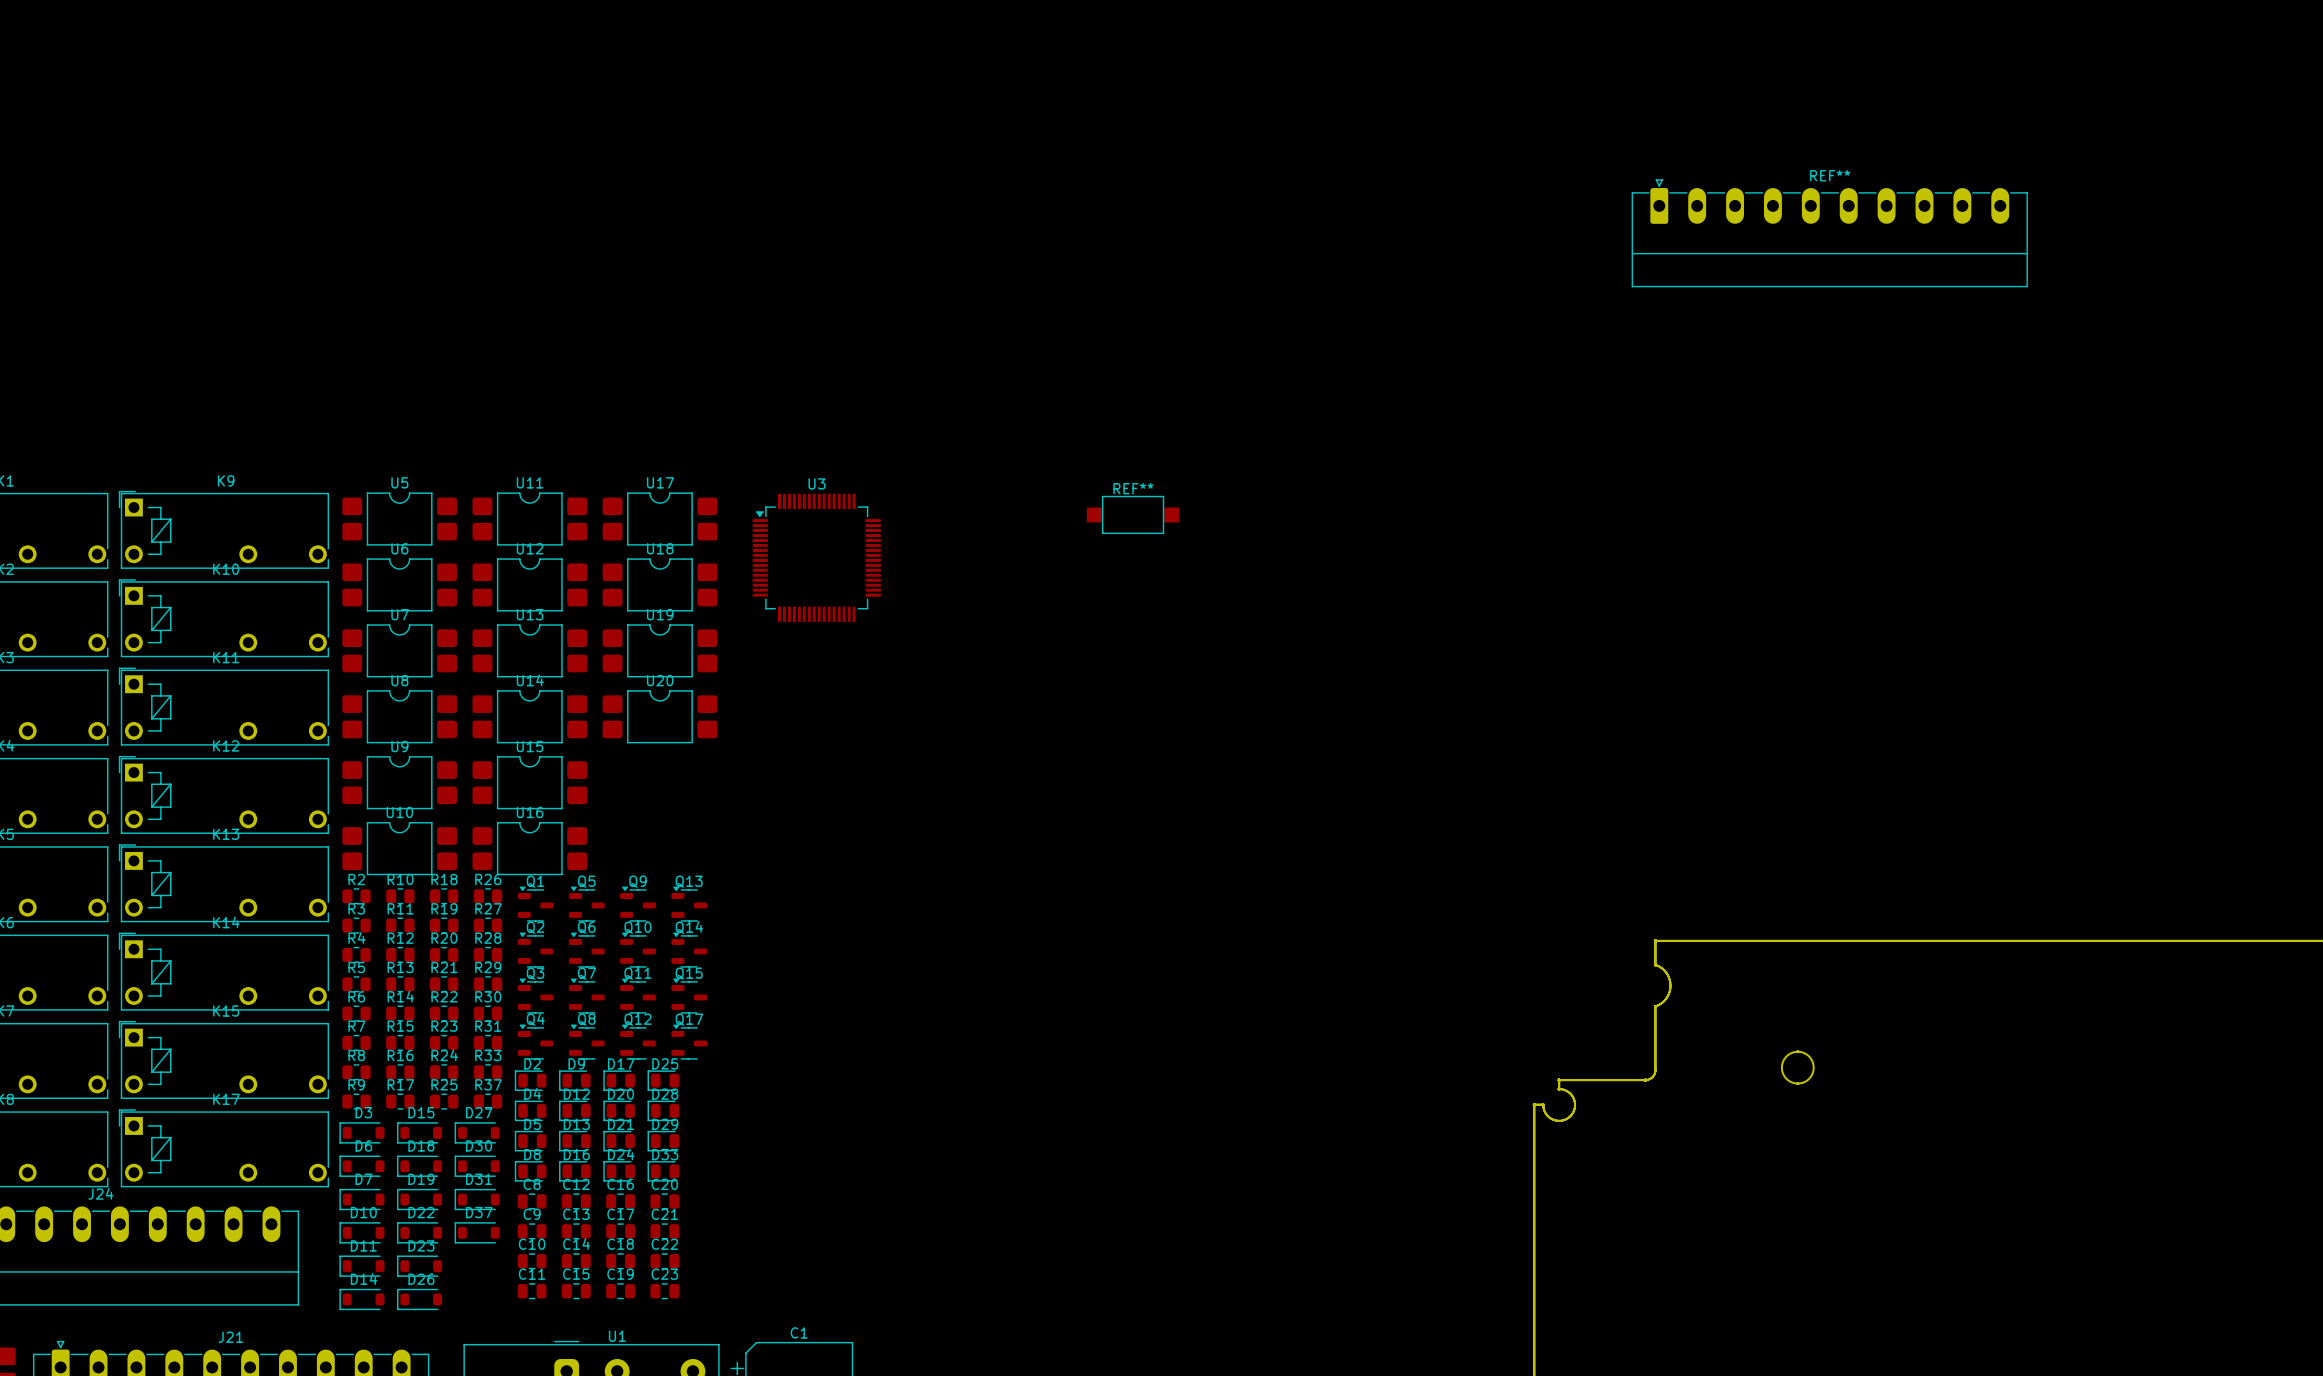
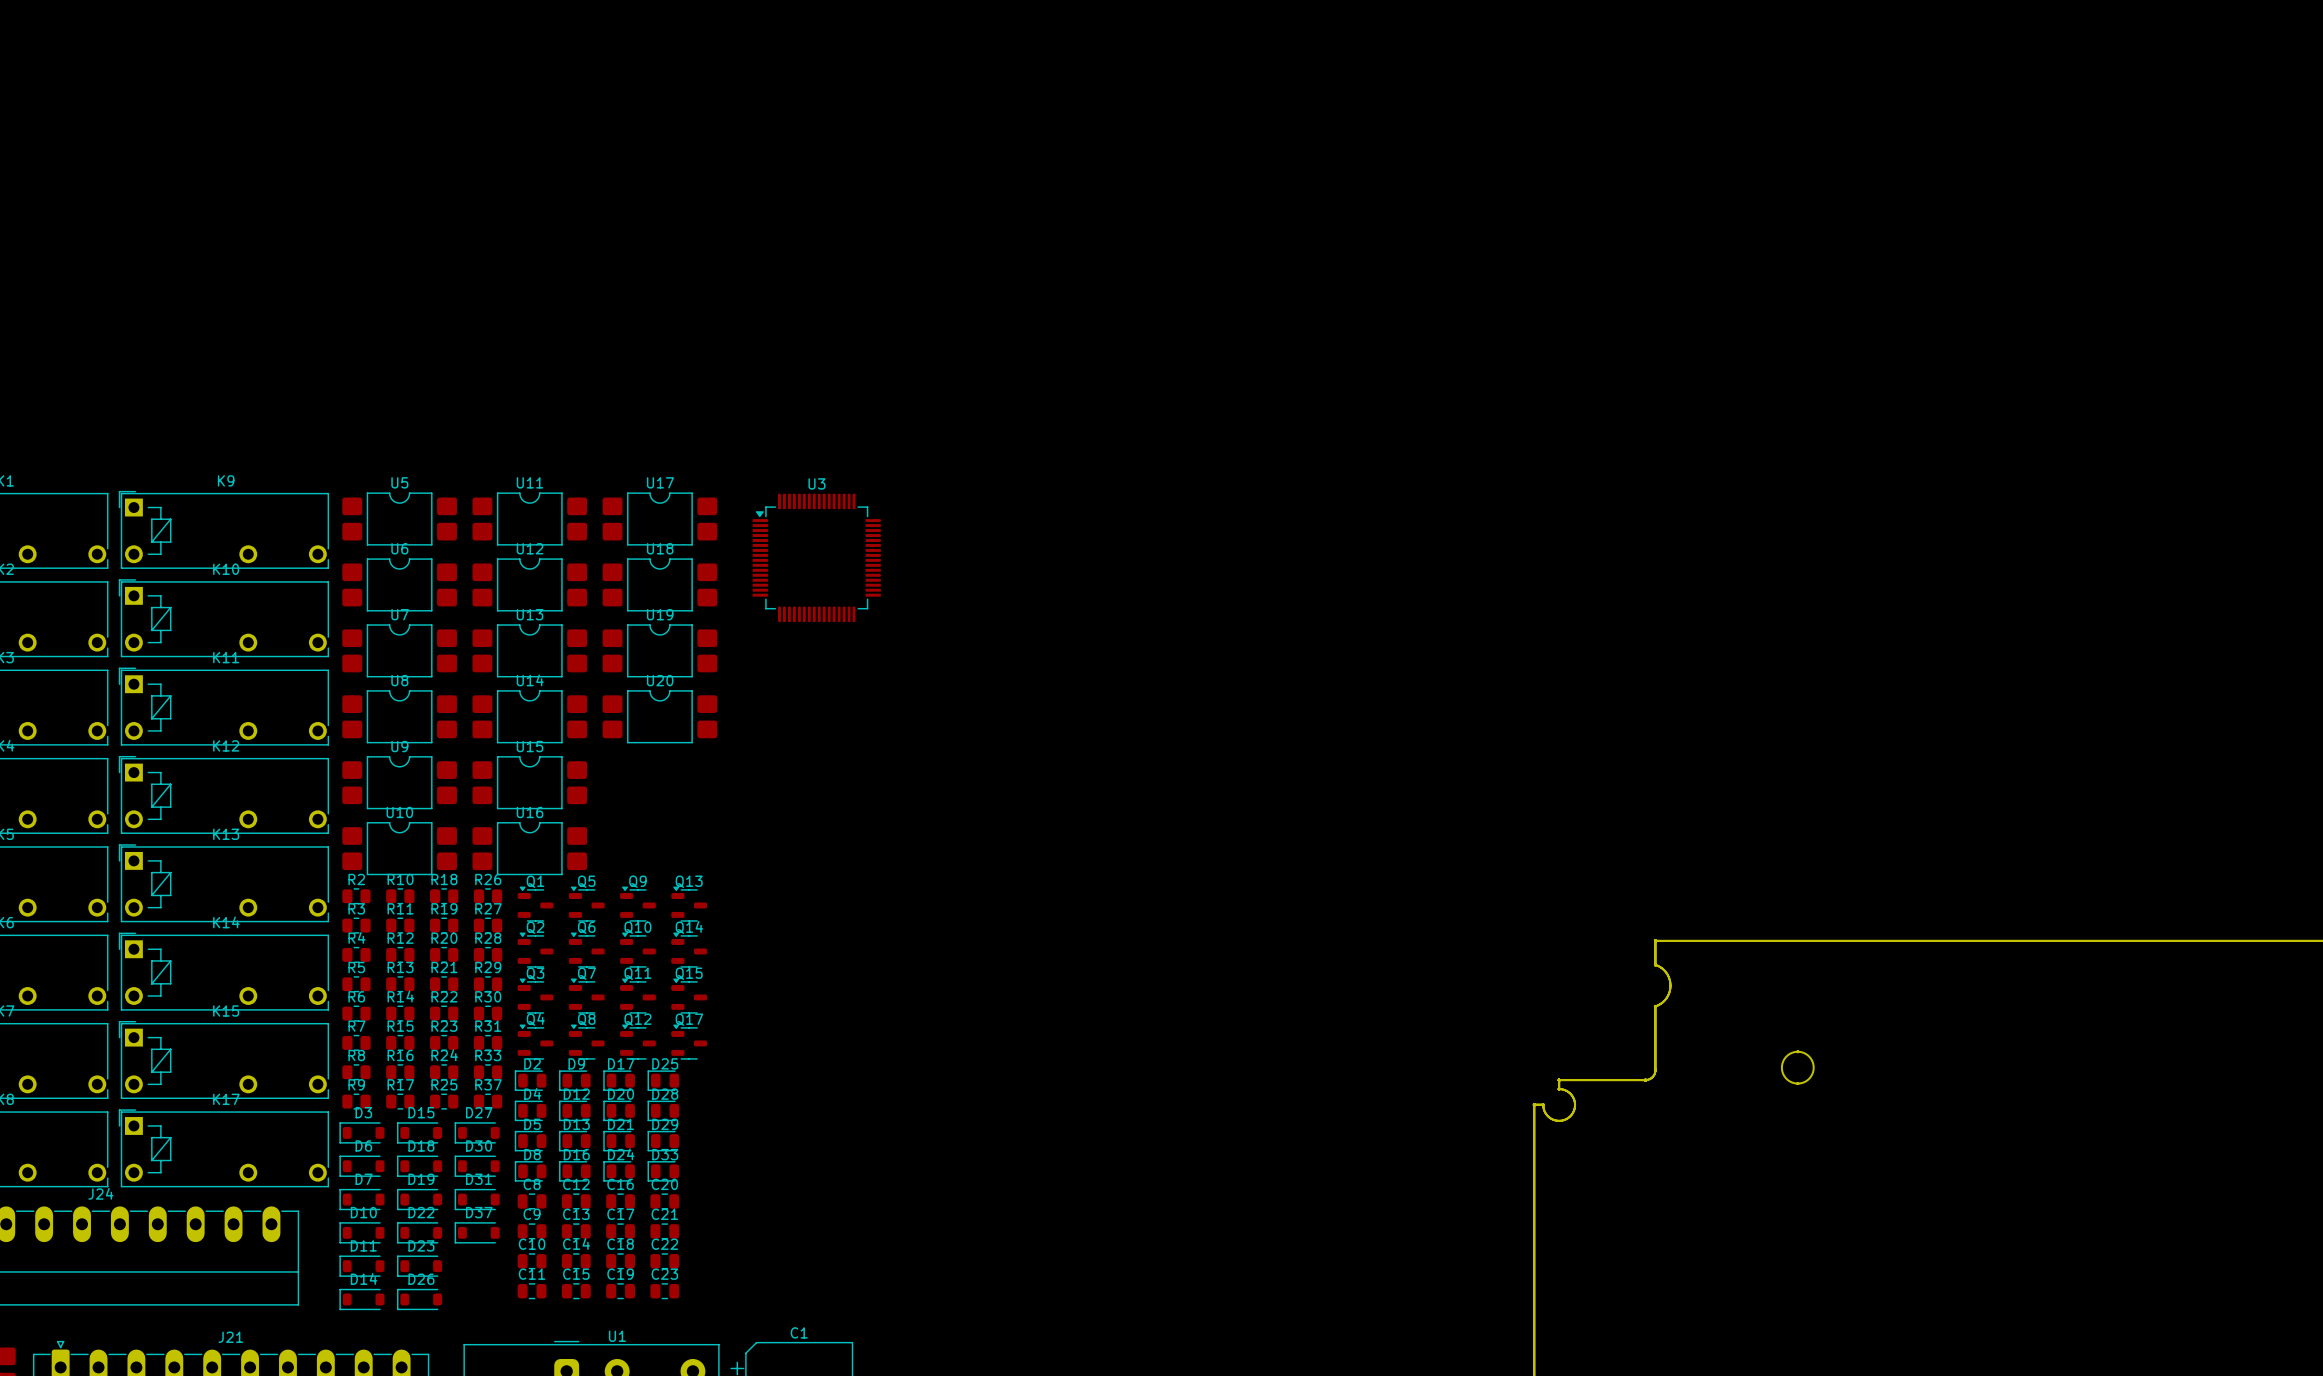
REF**: (1829, 233) -> none
REF**: (1133, 514) -> none

